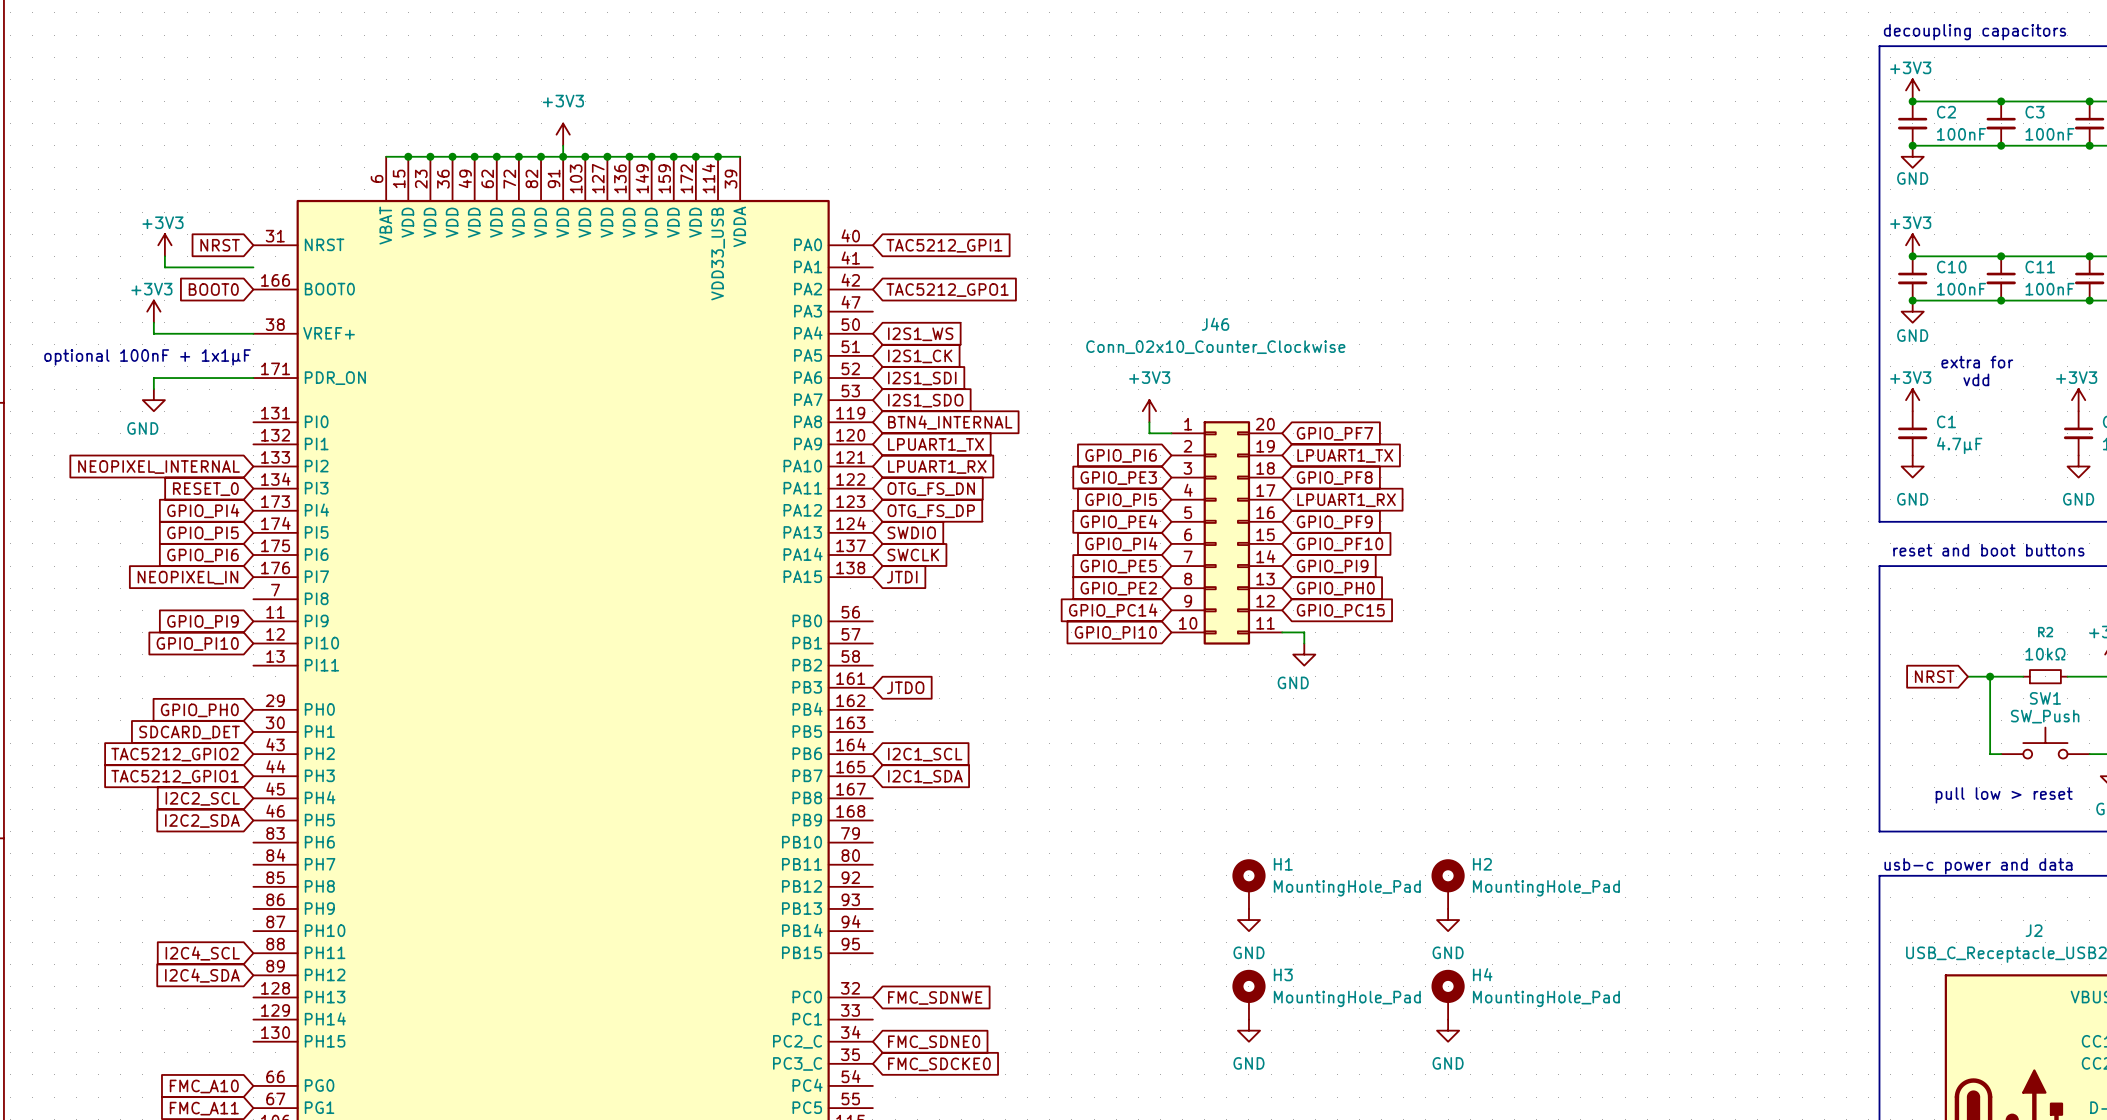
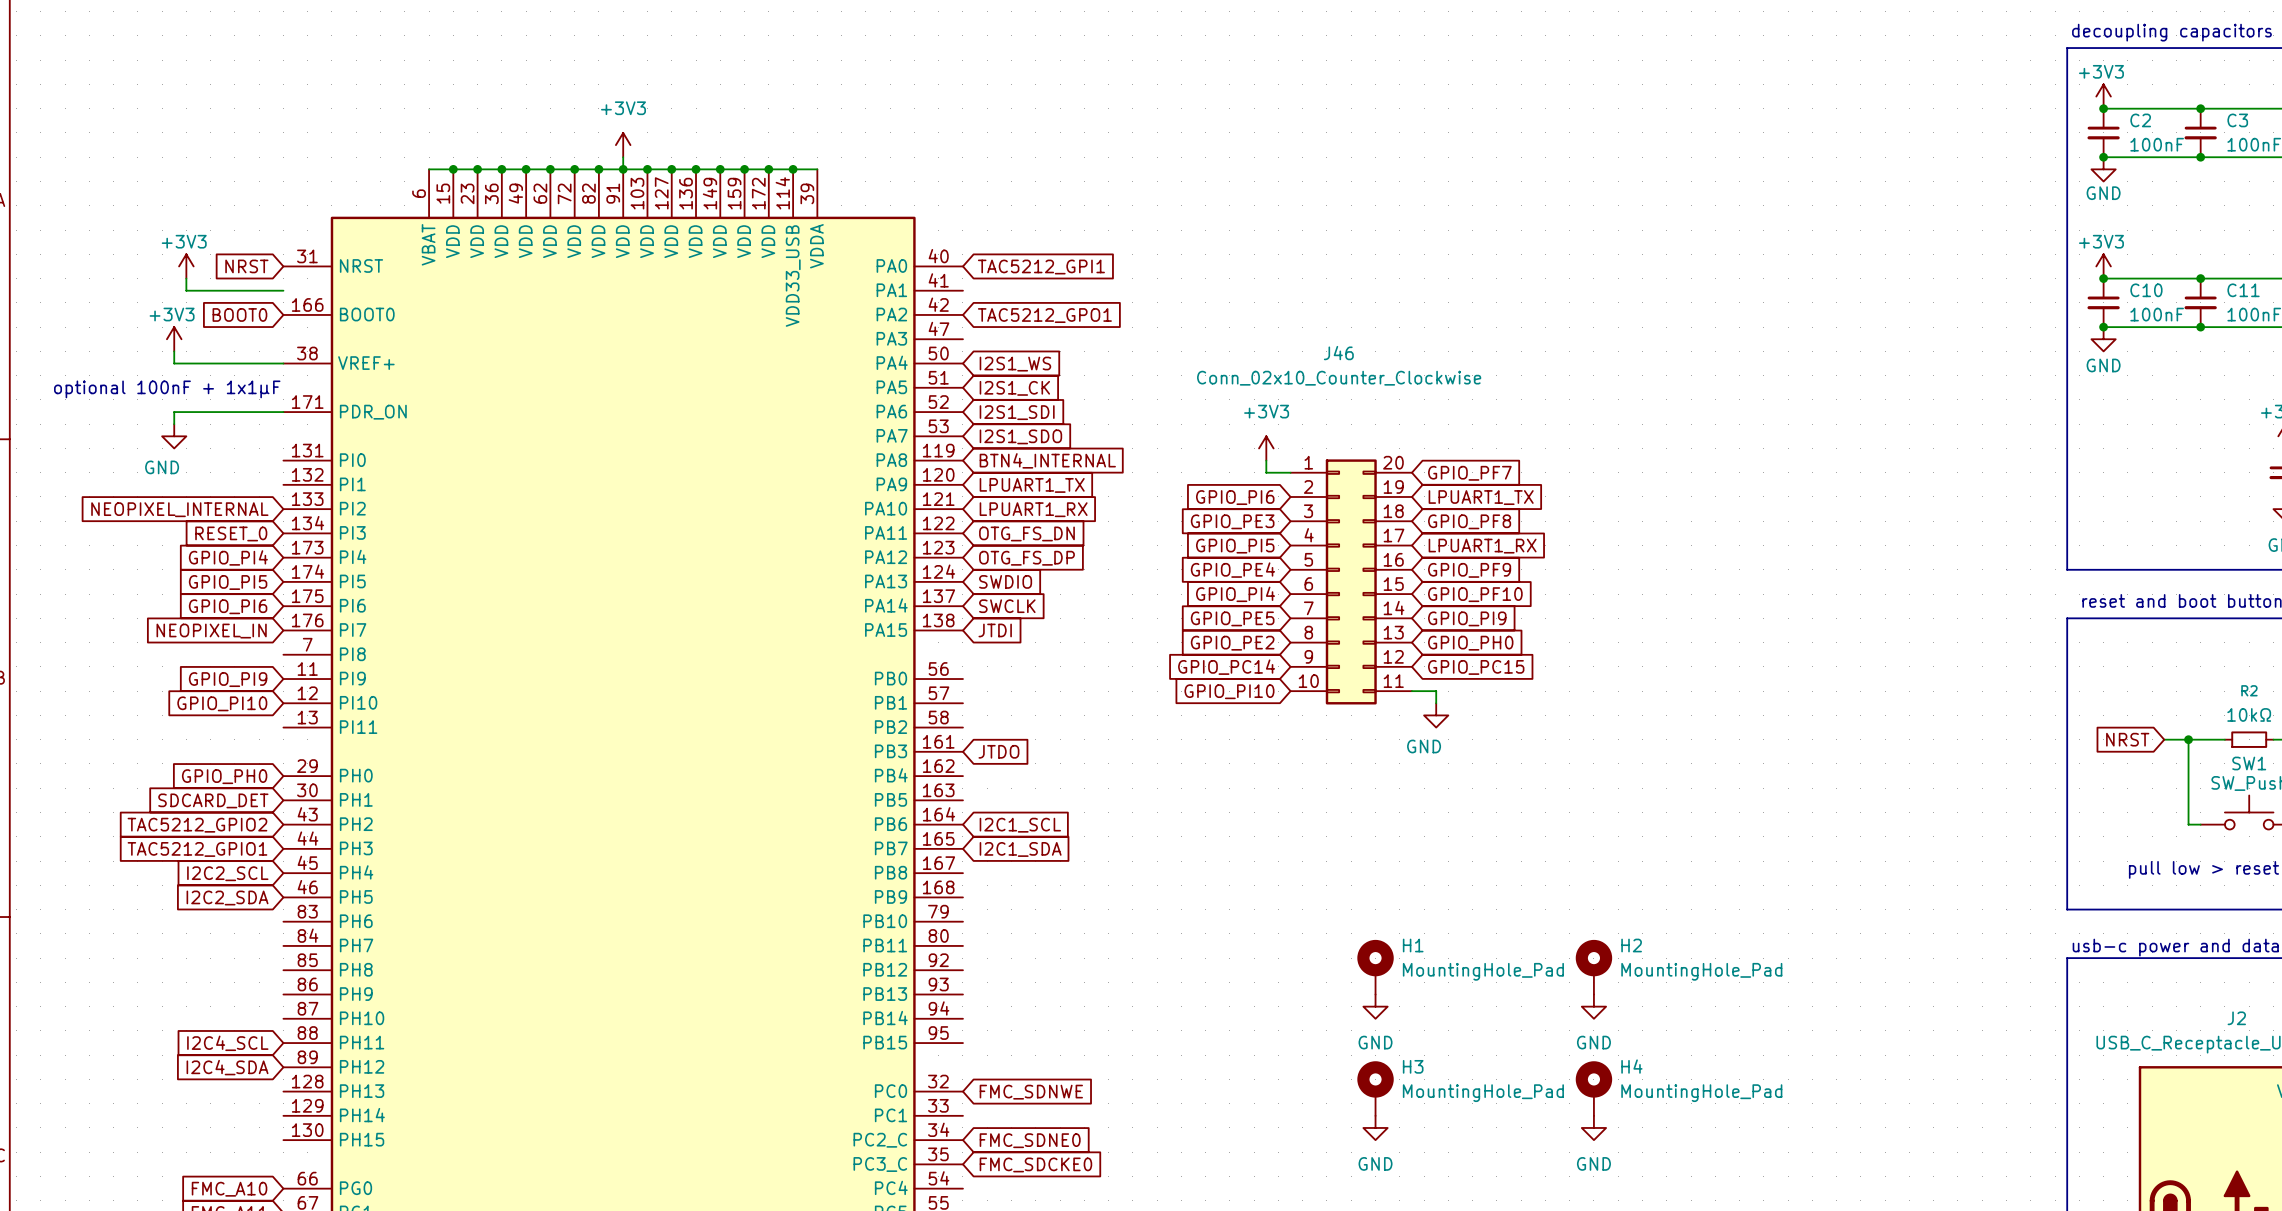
text: extra for (1977, 362) -> none
text: vdd (1976, 379) -> none
power symbol: +3V3 (1912, 400) -> none
C1: 4.7μF (1912, 433) -> none
power symbol: GND (1912, 466) -> none

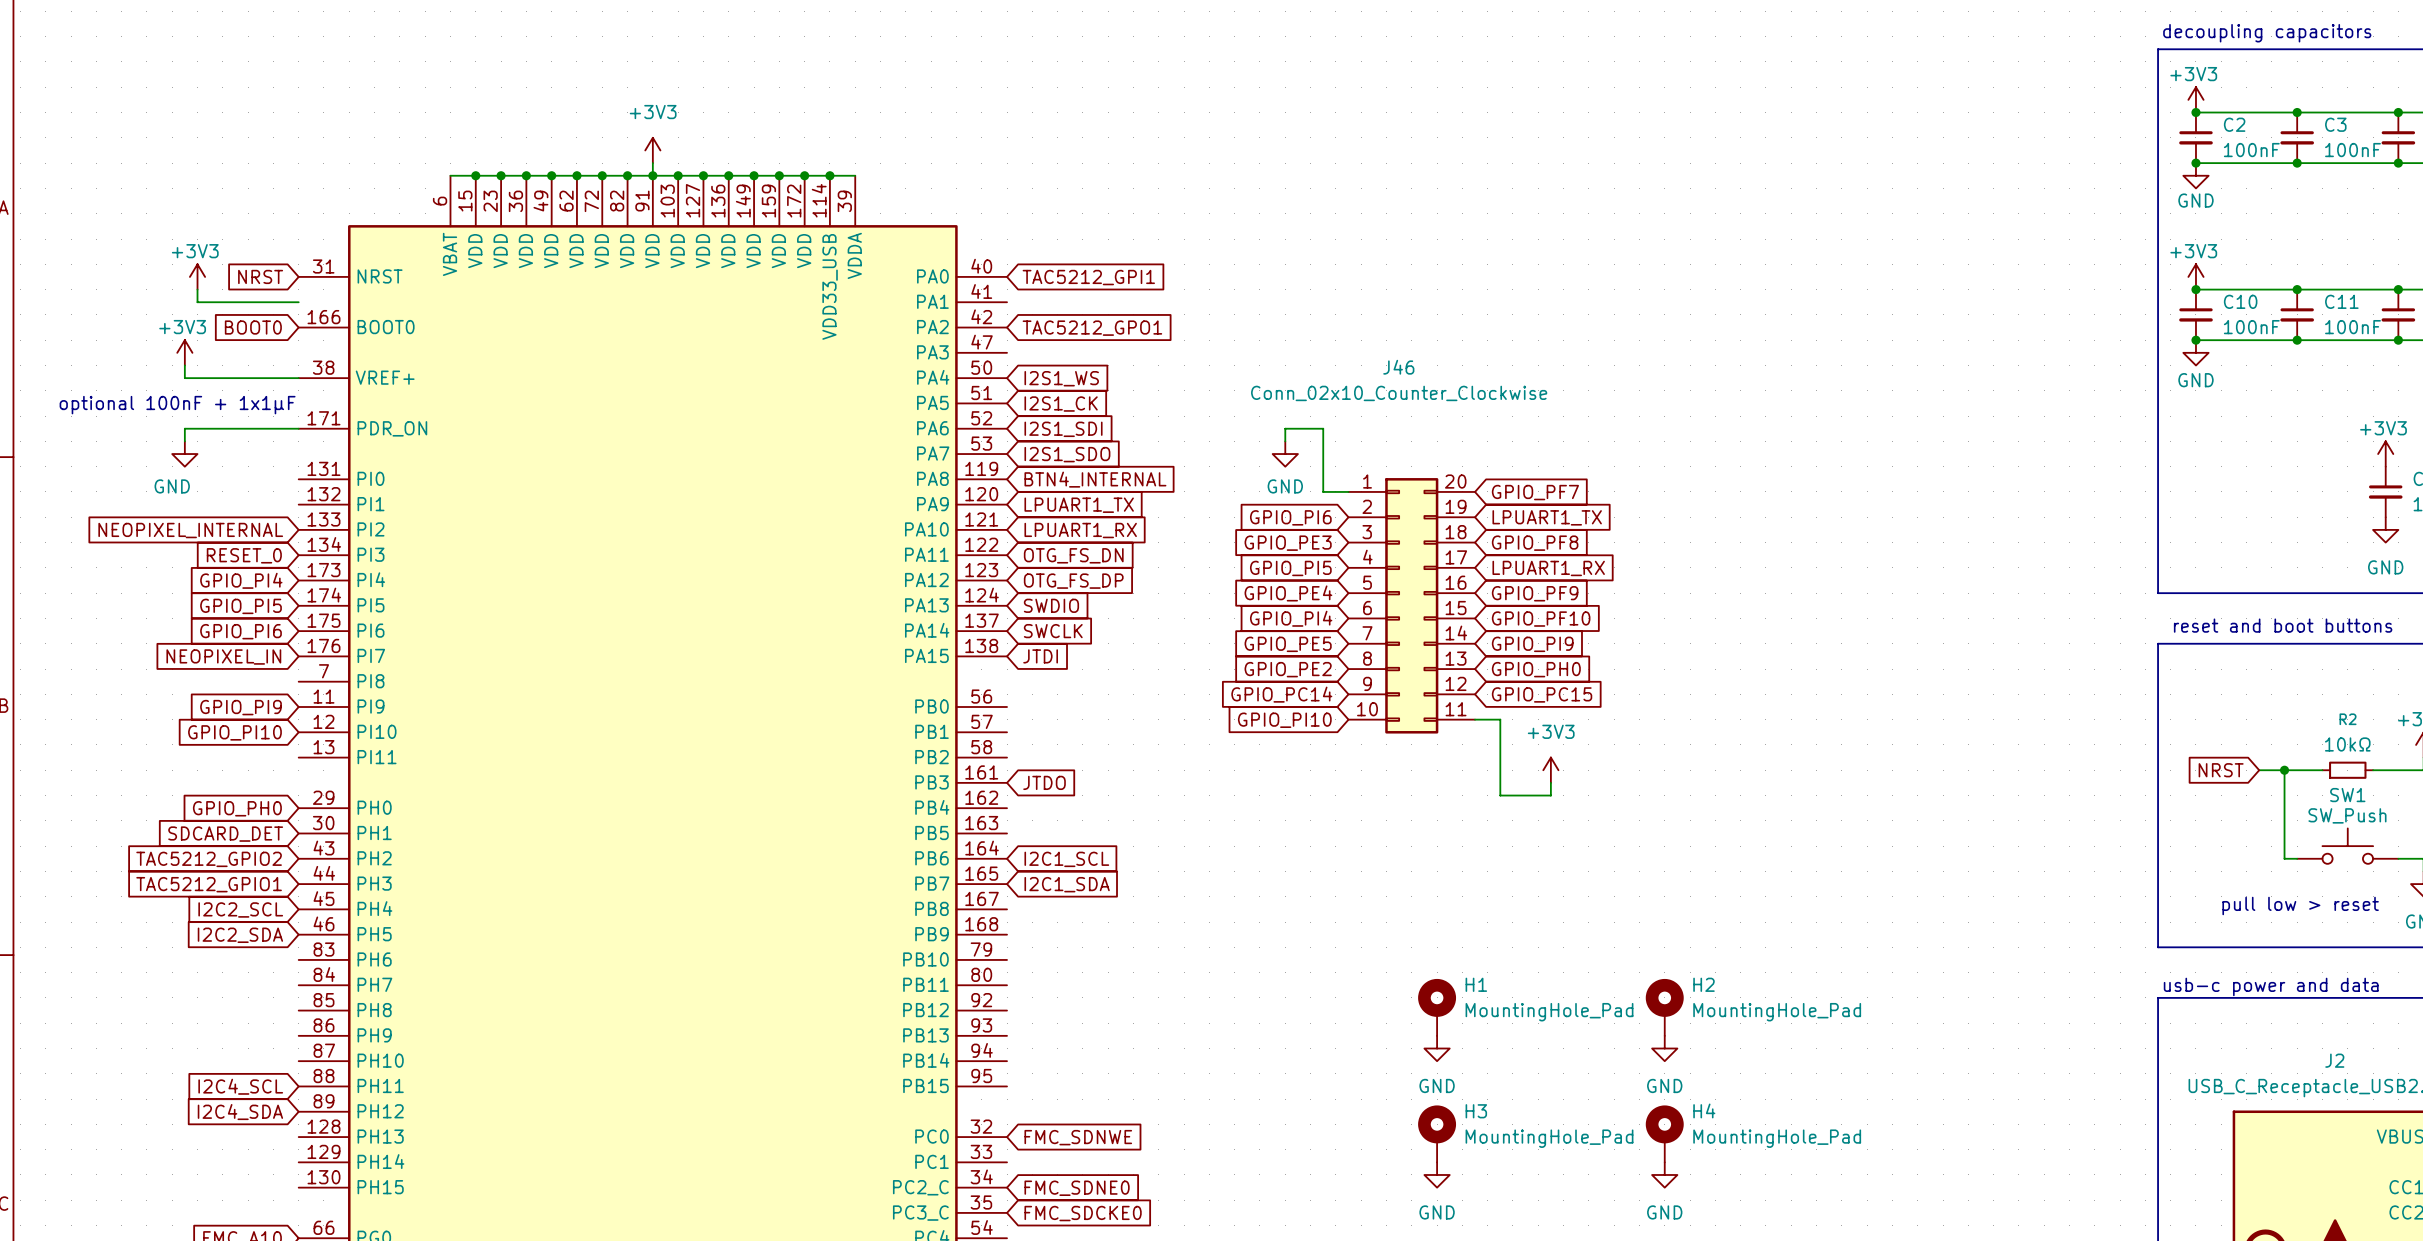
wire: none -> (1285, 441) (1285, 428) (1323, 428) (1323, 479)
power symbol: none -> GND (1285, 454)
power symbol: +3V3 (1266, 448) -> none
wire: none -> (1500, 732) (1500, 795) (1550, 795) (1550, 782)
power symbol: GND (1436, 715) -> none
power symbol: none -> +3V3 (1550, 770)

